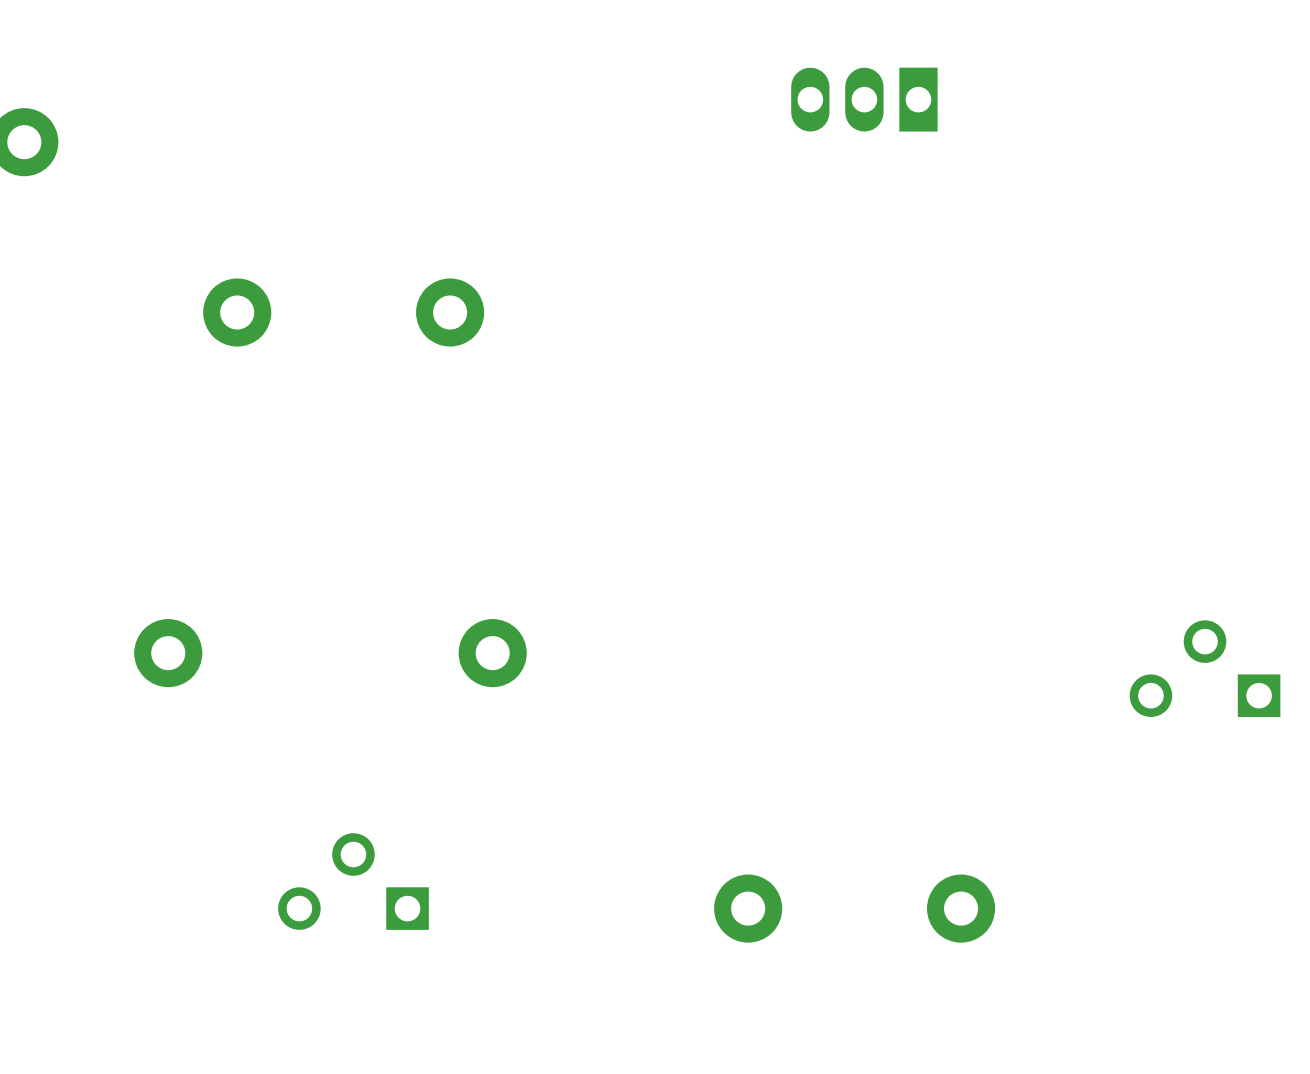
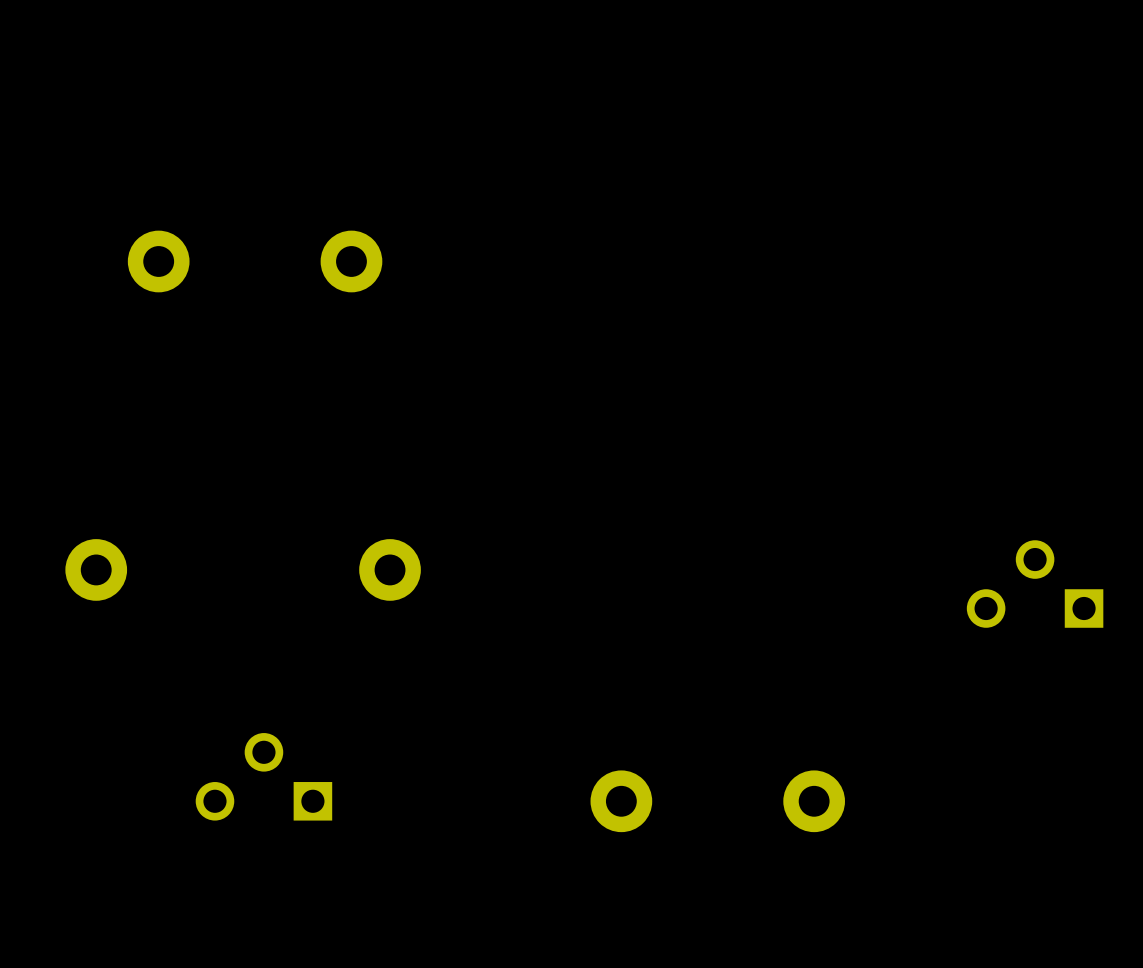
part: (864, 99) -> none

